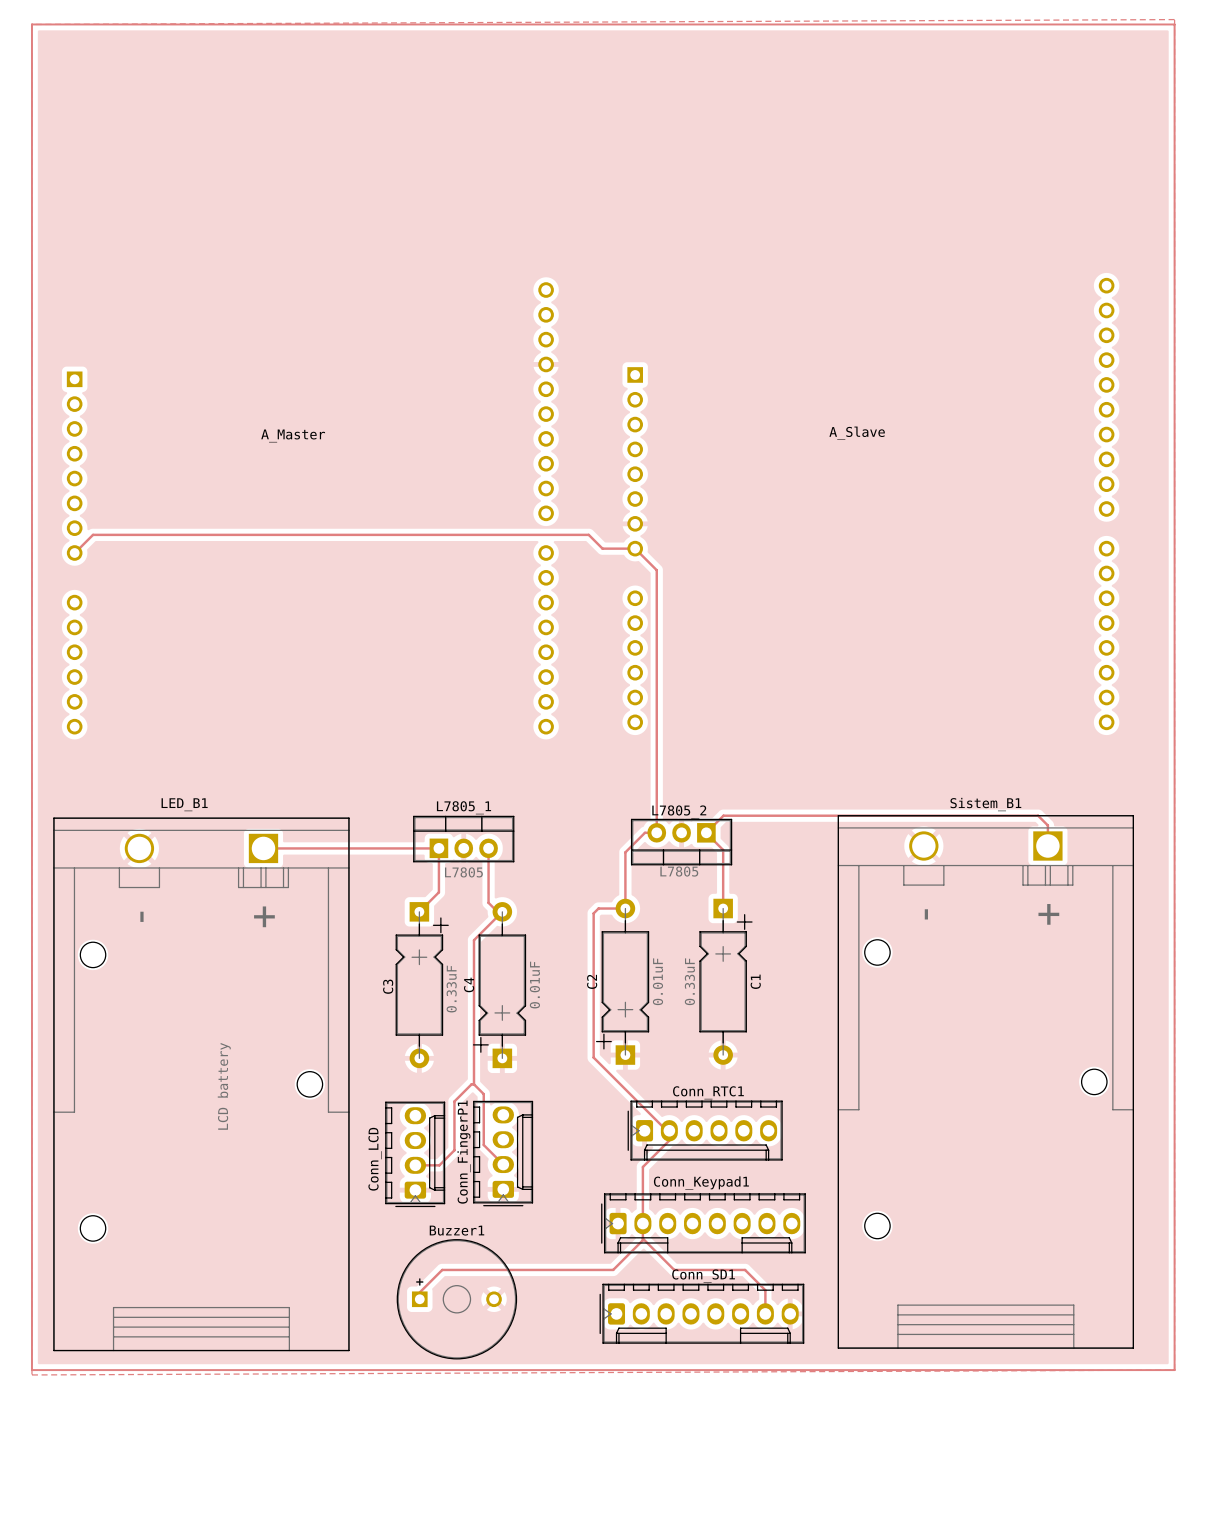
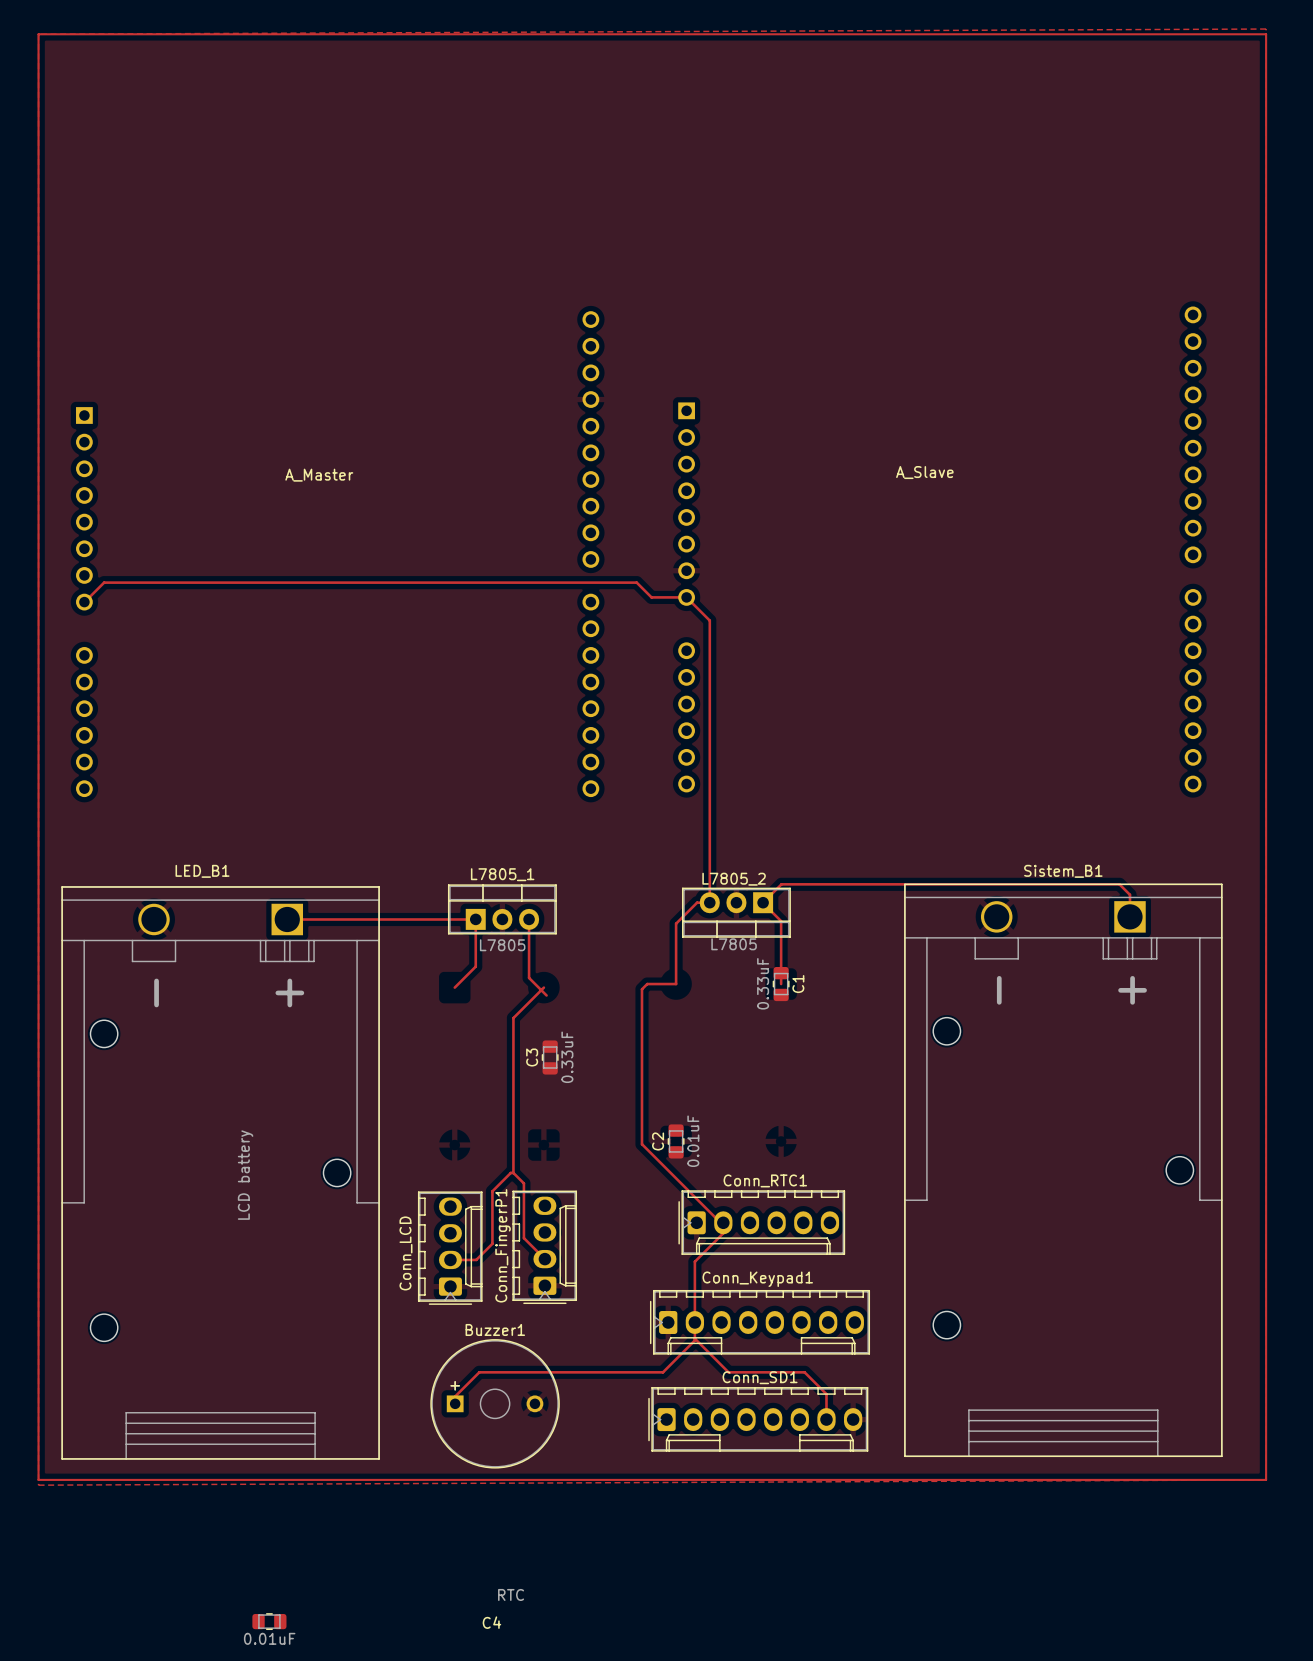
C2 footprint: [596, 898, 650, 1065] -> [667, 1124, 685, 1159]
C1 footprint: [699, 898, 753, 1065] -> [772, 966, 790, 1002]
C3 footprint: [395, 902, 449, 1069] -> [541, 1040, 559, 1075]
C4 footprint: [472, 902, 527, 1069] -> [252, 1613, 287, 1630]
C4 name position: C4 (469, 984) -> C4 (491, 1622)
C4 value position: 0.01uF (534, 985) -> 0.01uF (269, 1638)
text: none -> RTC (511, 1594)

